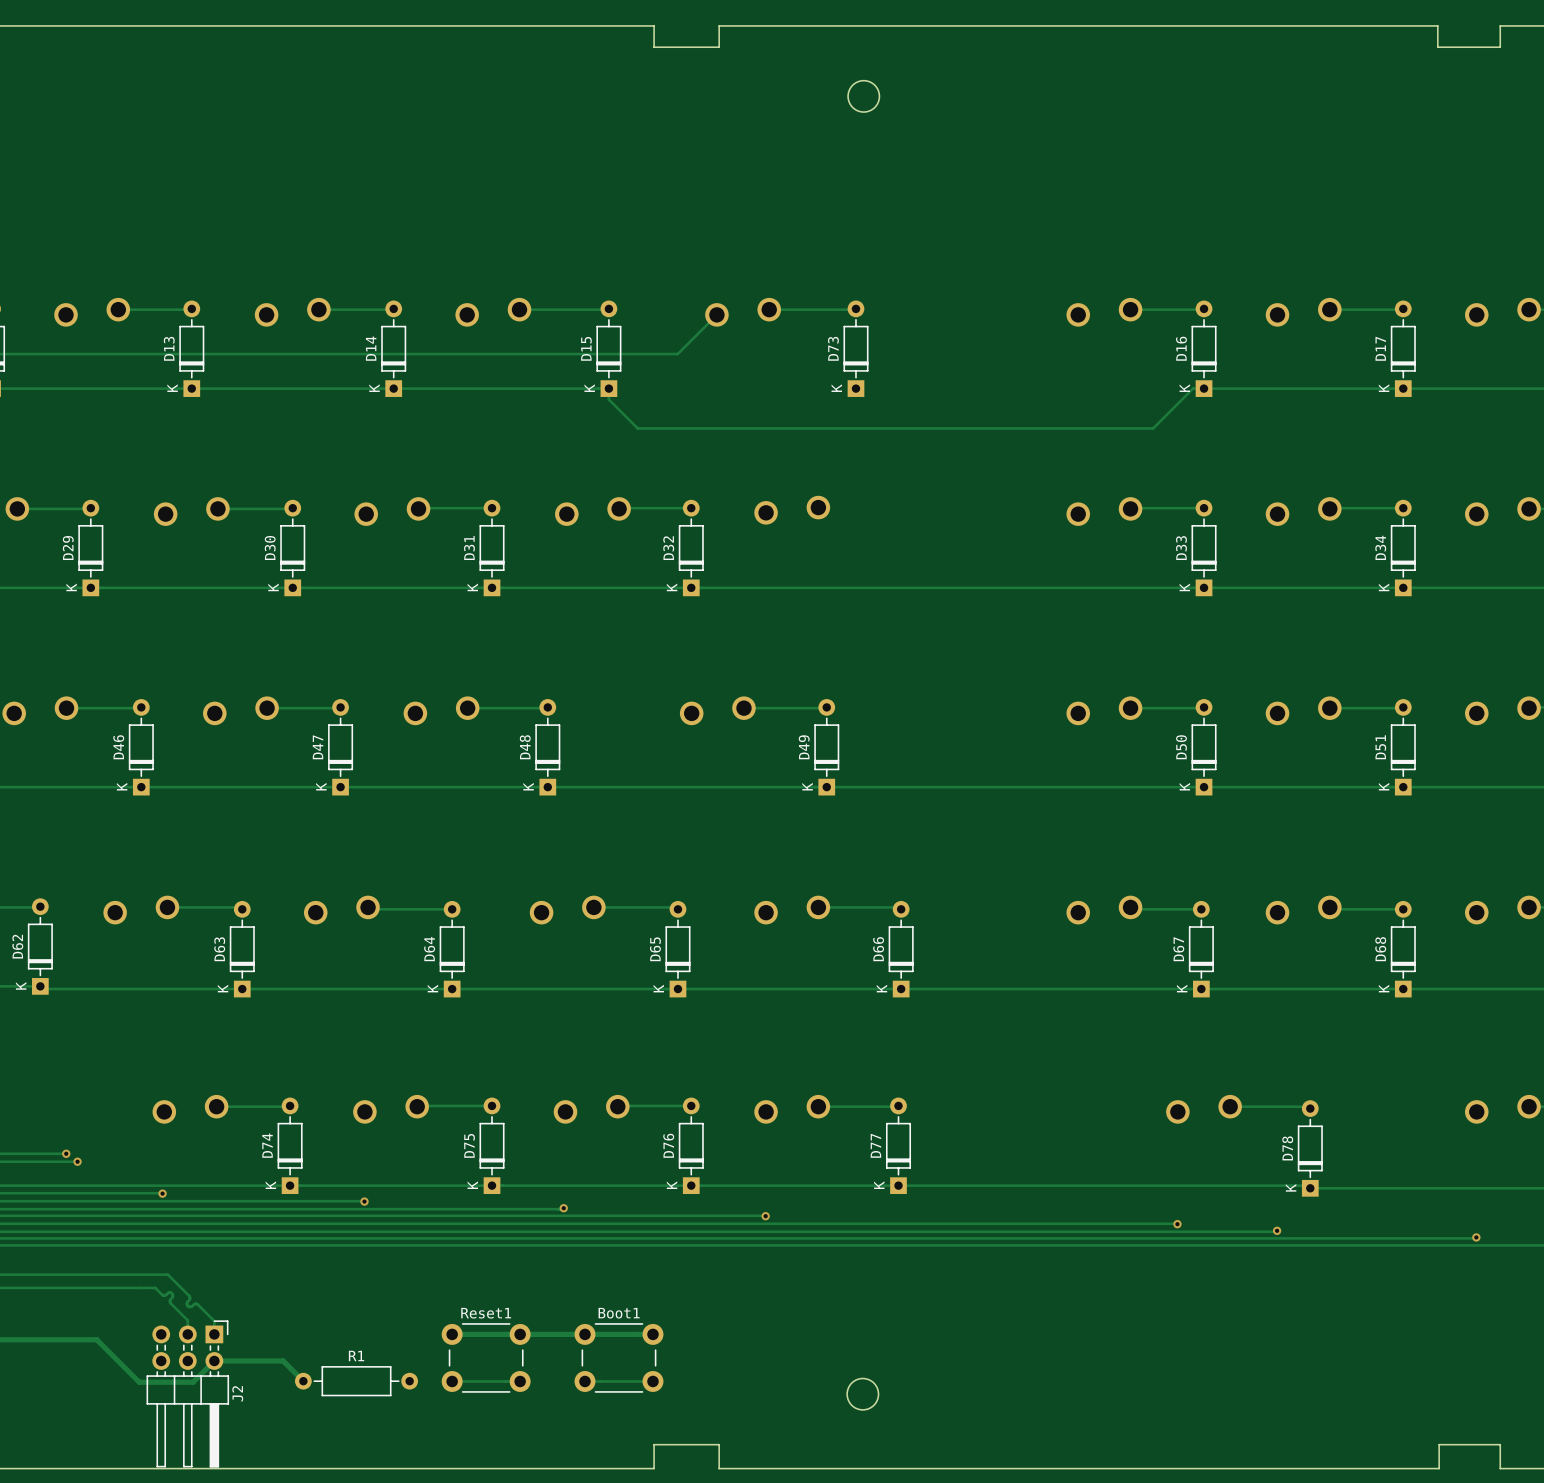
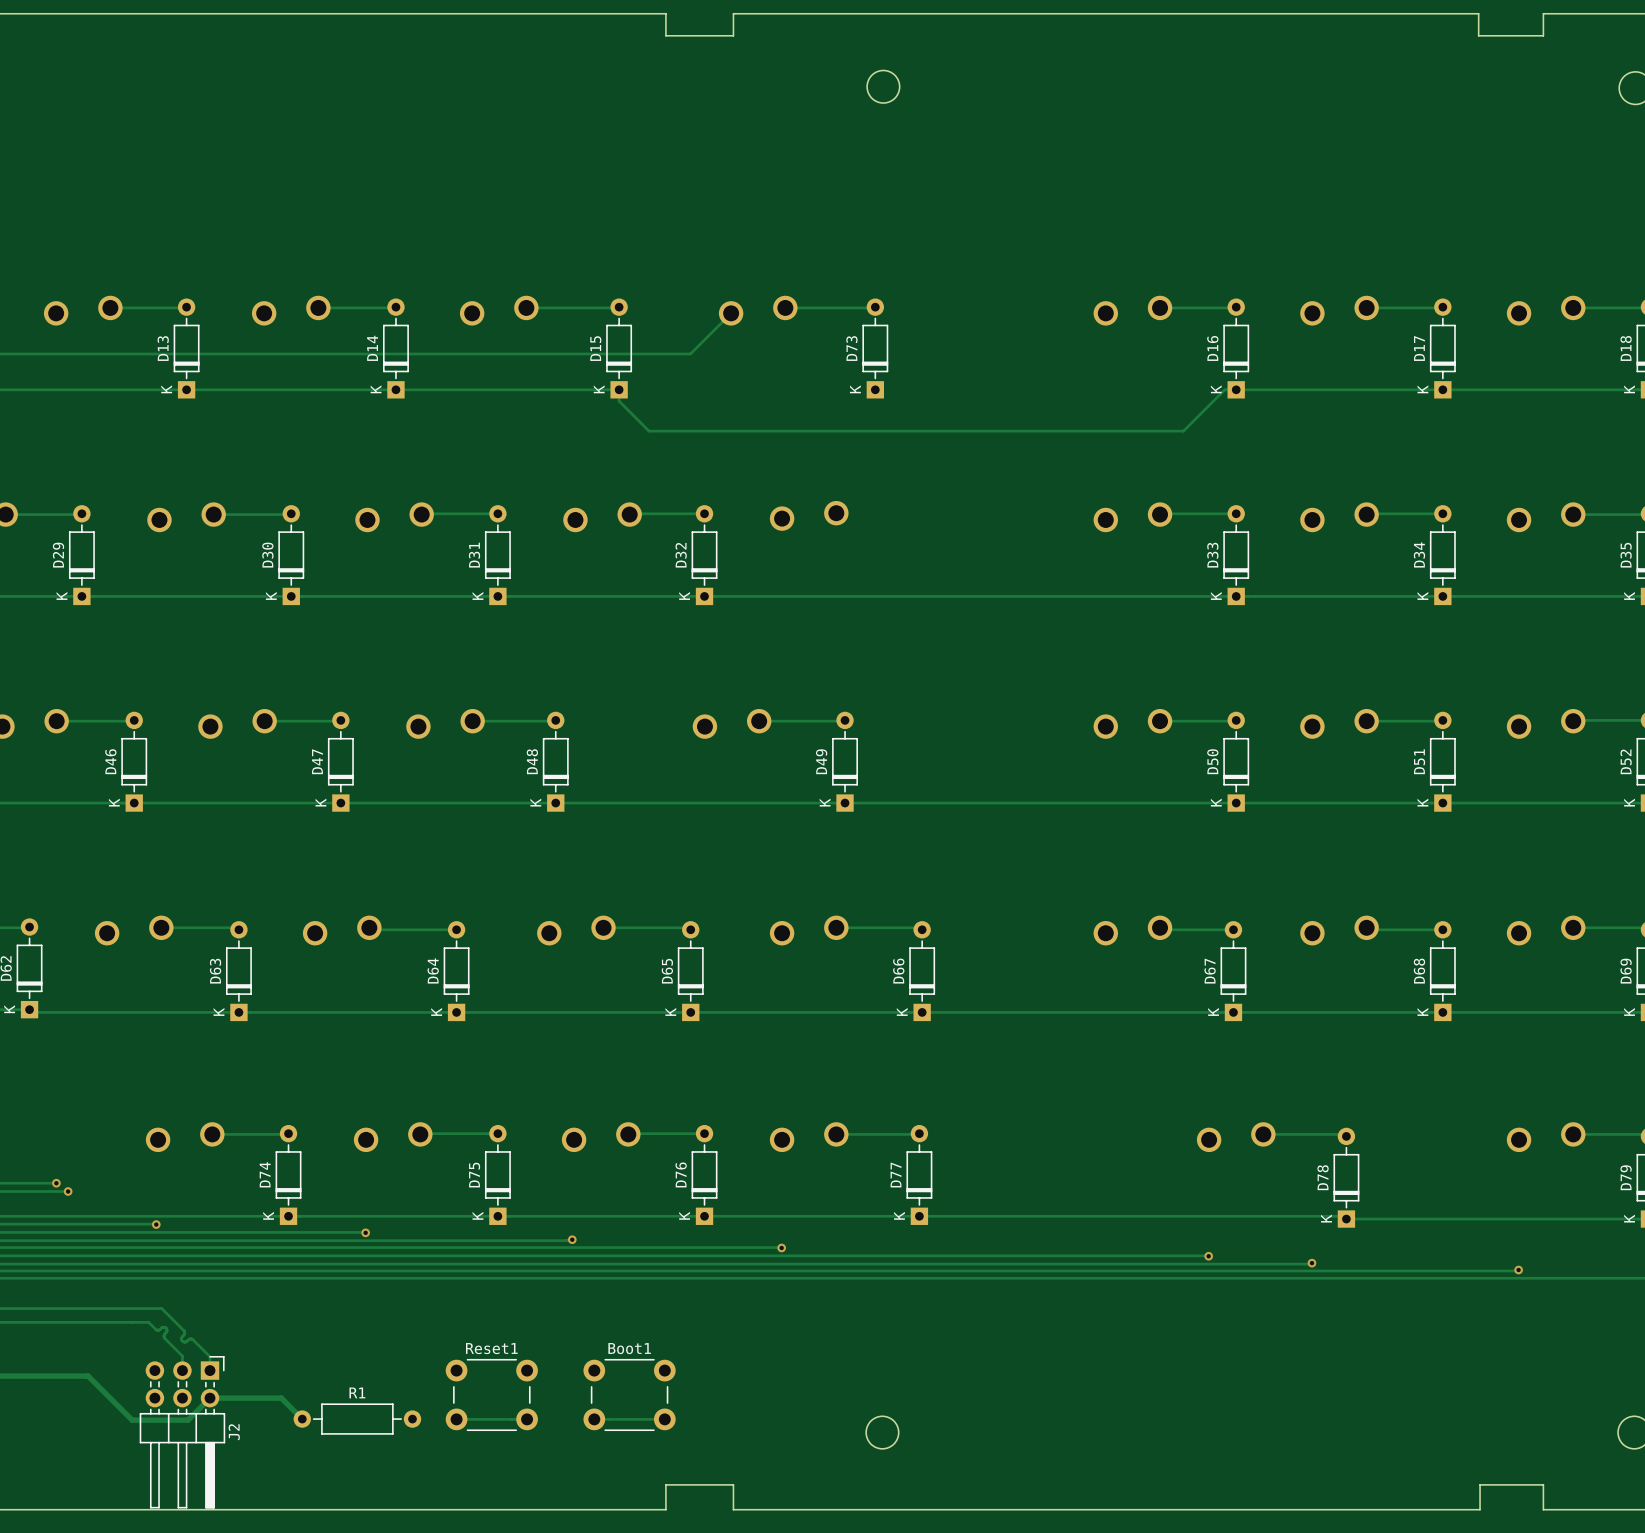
track: (452, 1334) (652, 1334) -> none

